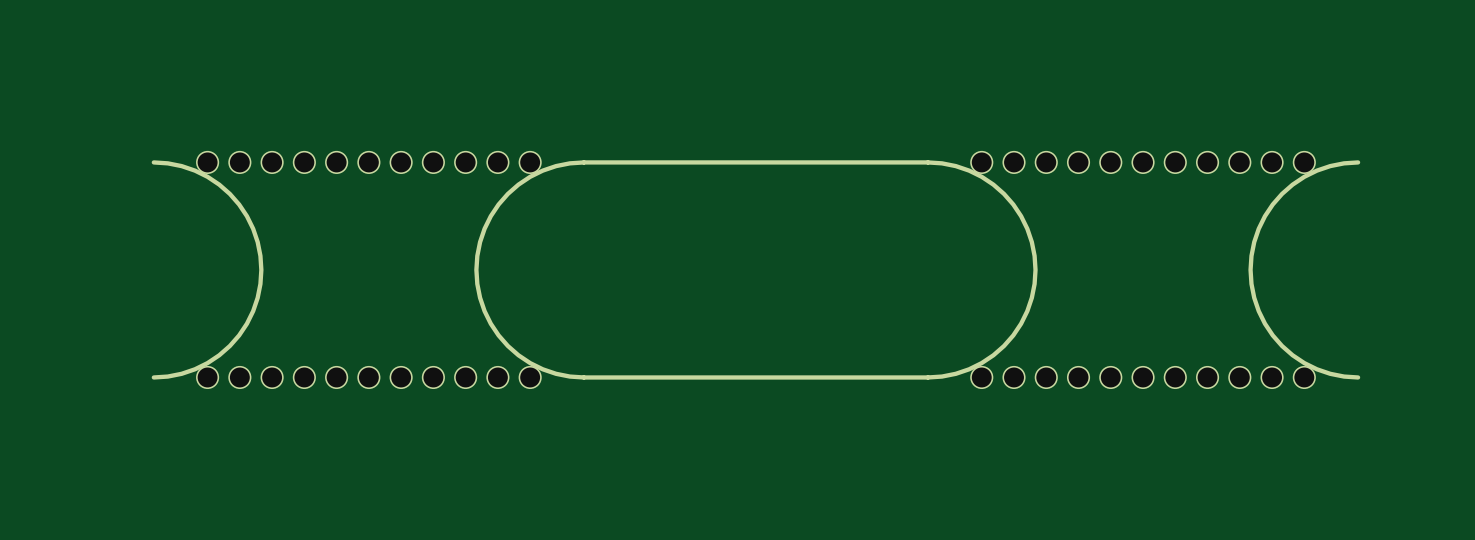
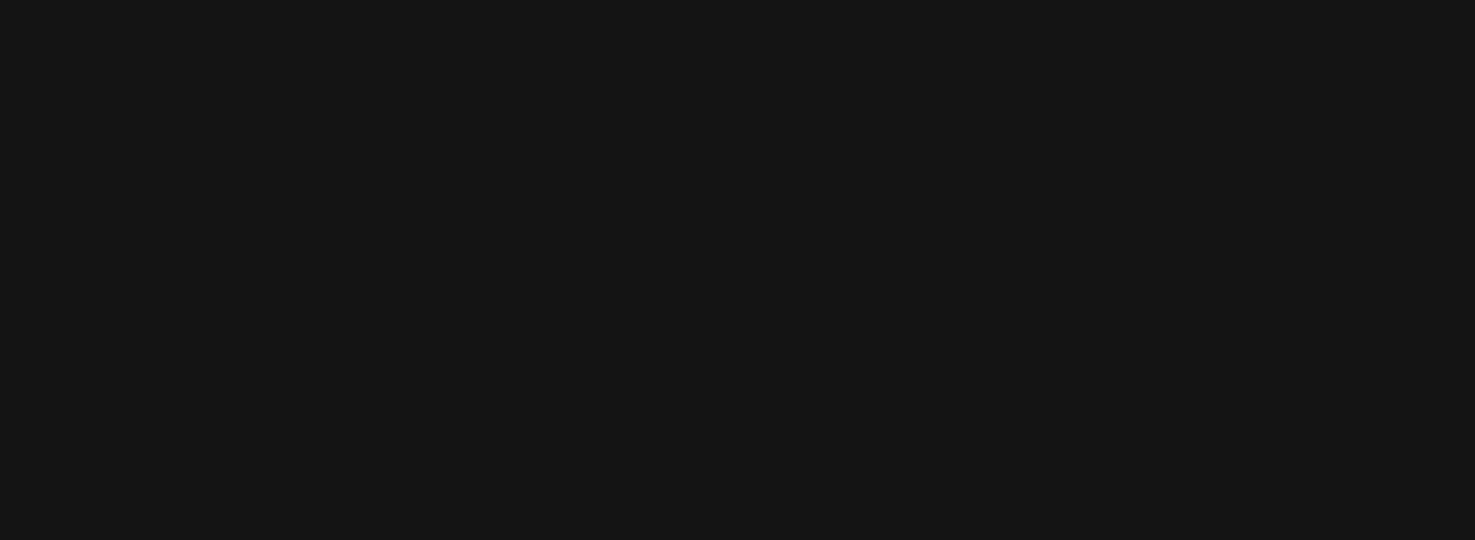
board edge: (583, 162) (927, 162) -> none
part: (368, 269) -> none
part: (1143, 269) -> none
board edge: (583, 377) (927, 377) -> none

